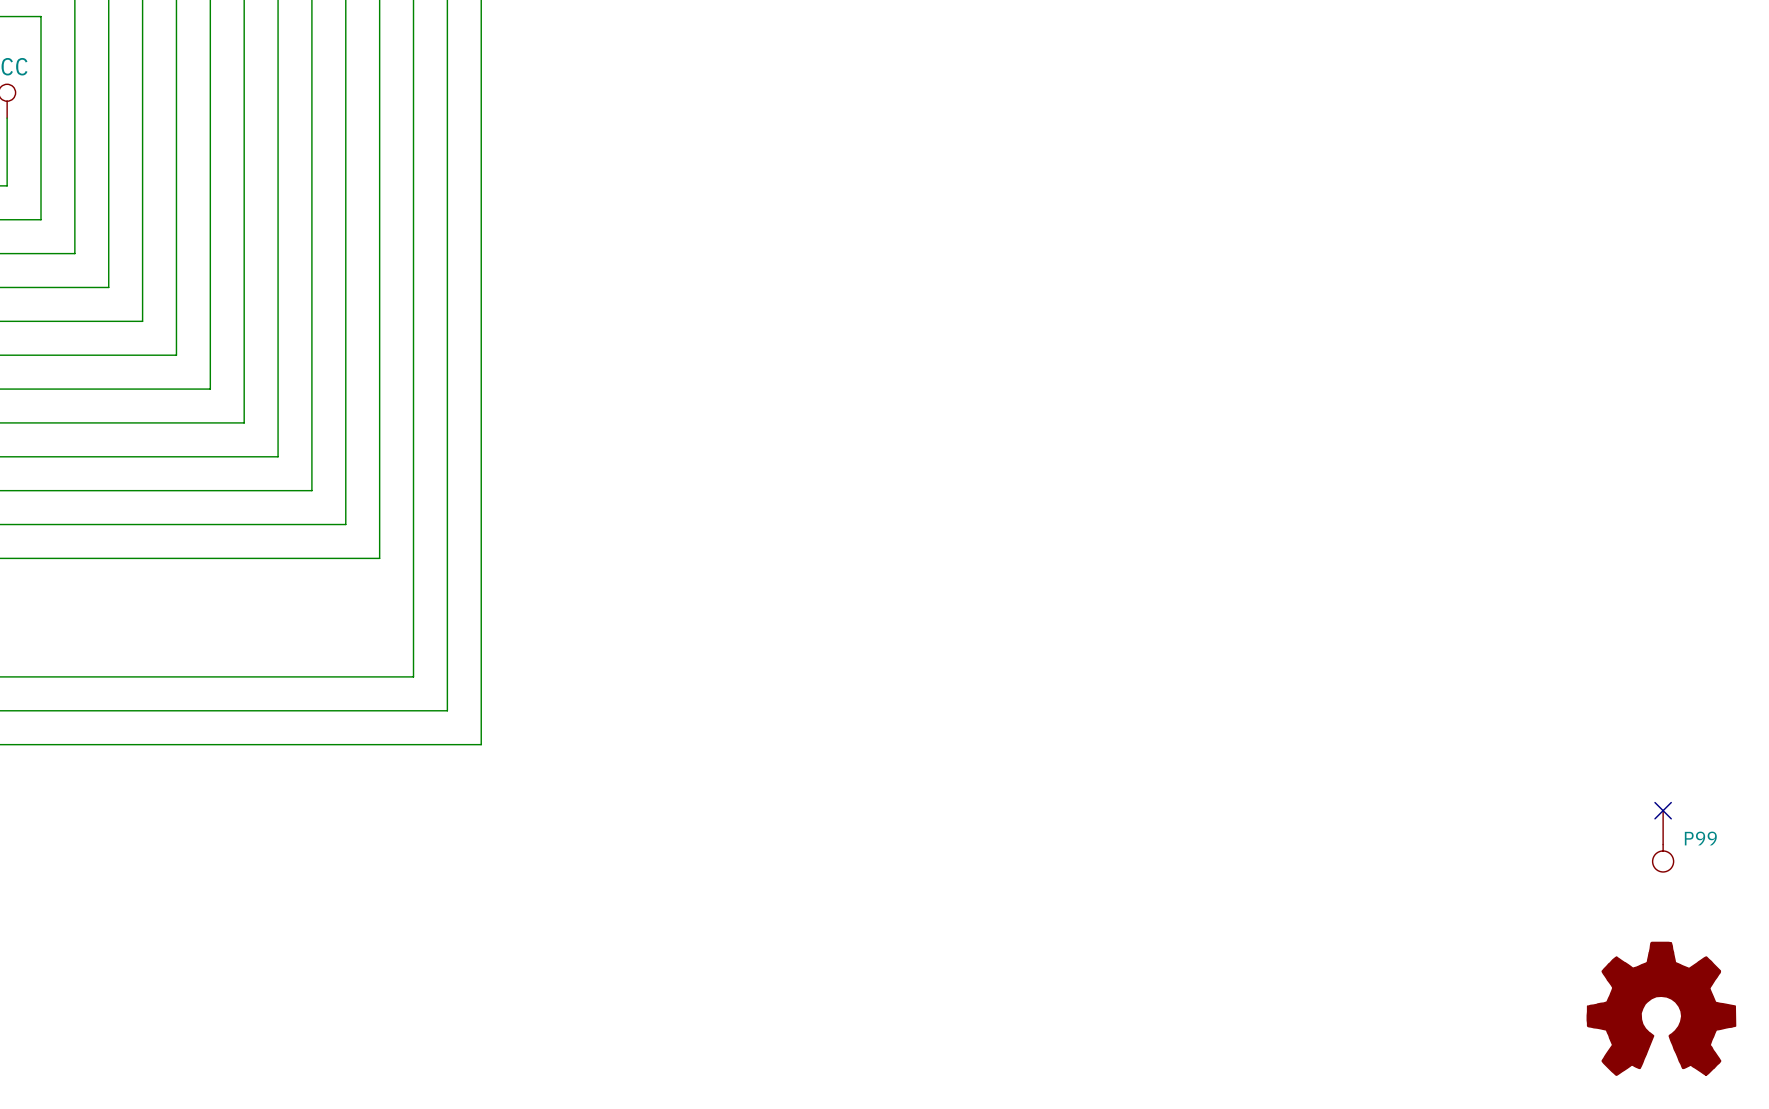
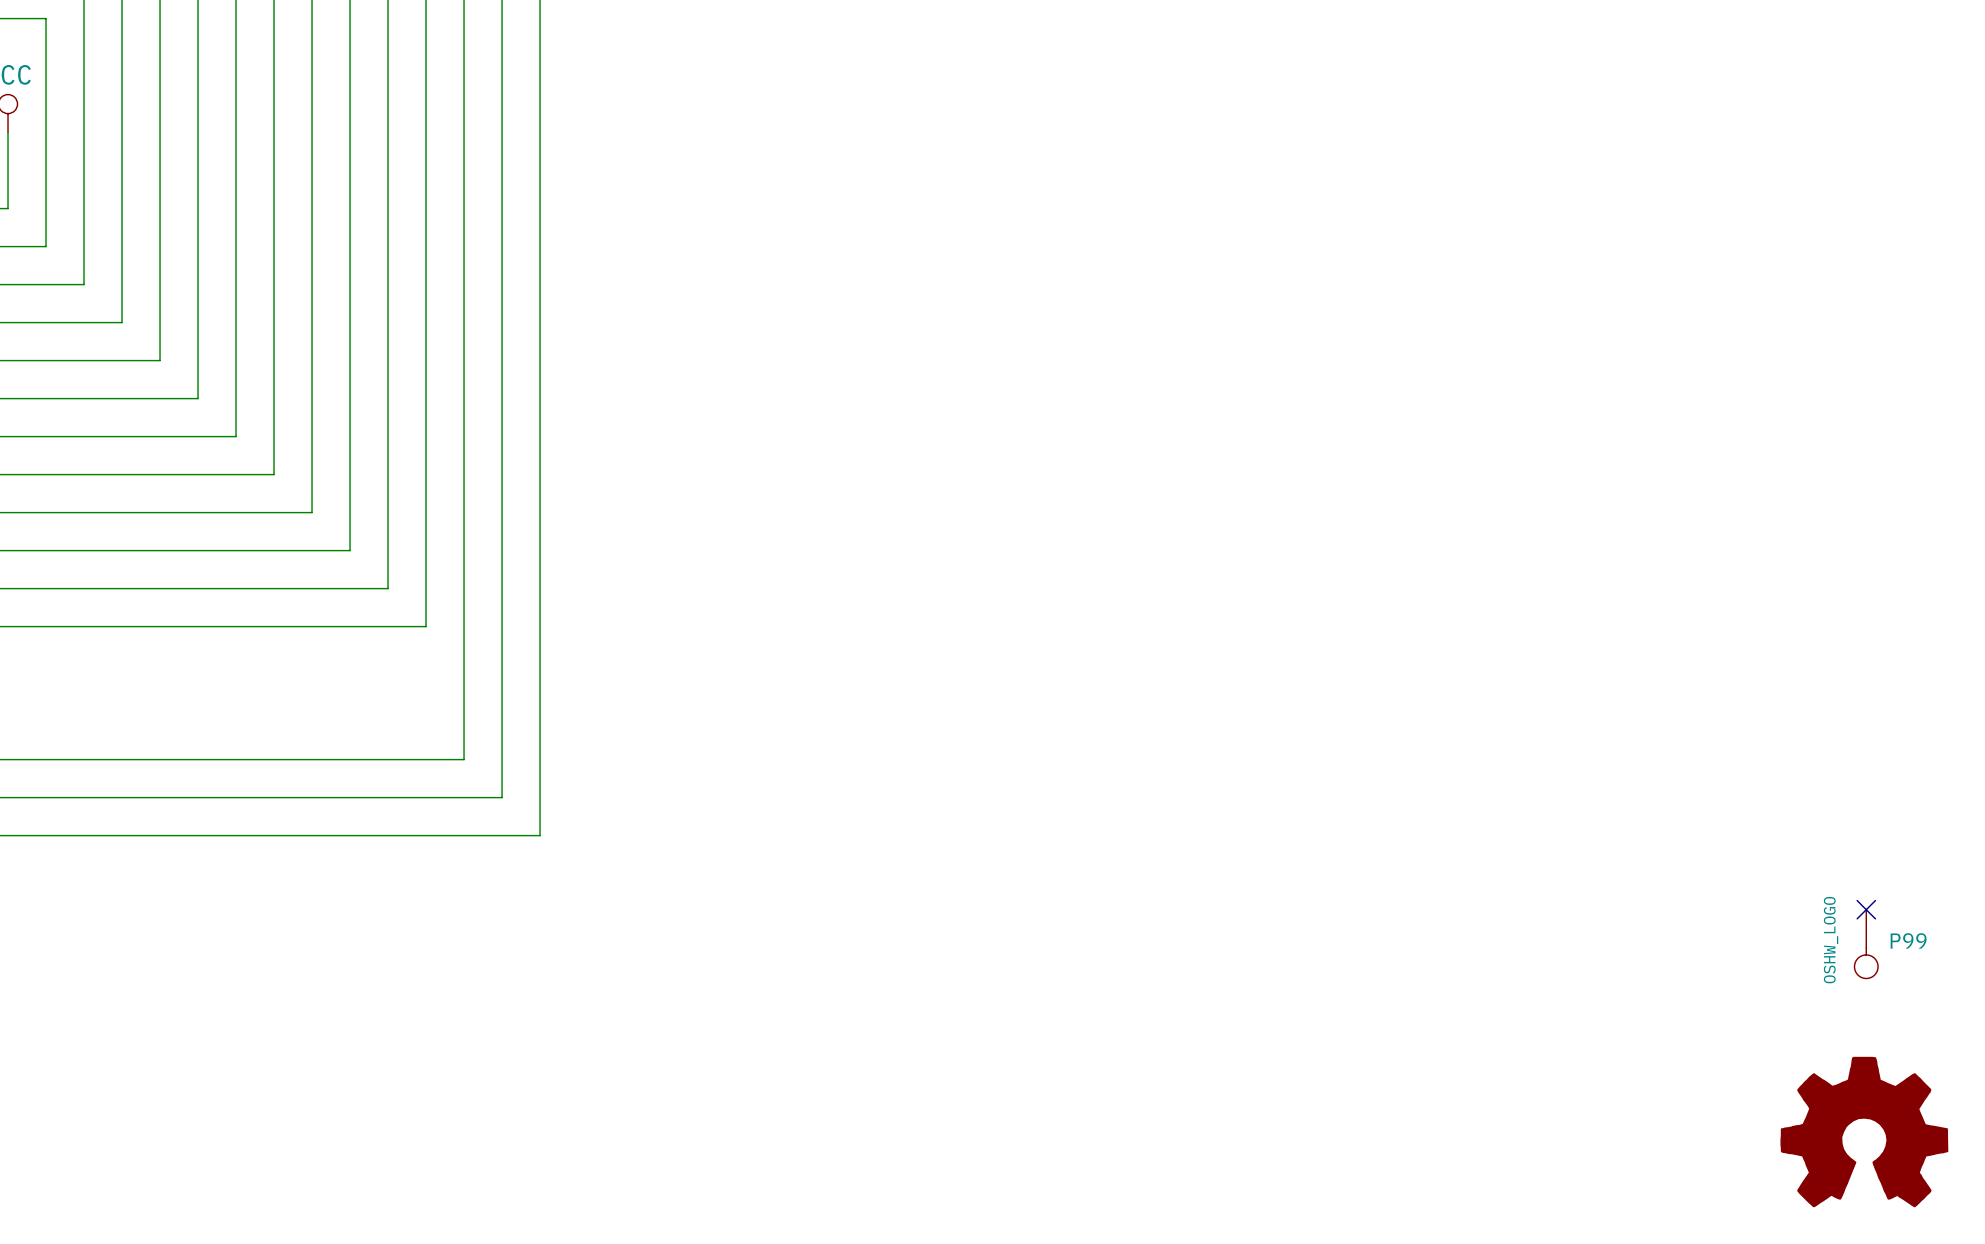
P99 value: none -> OSHW_LOGO (1831, 940)

